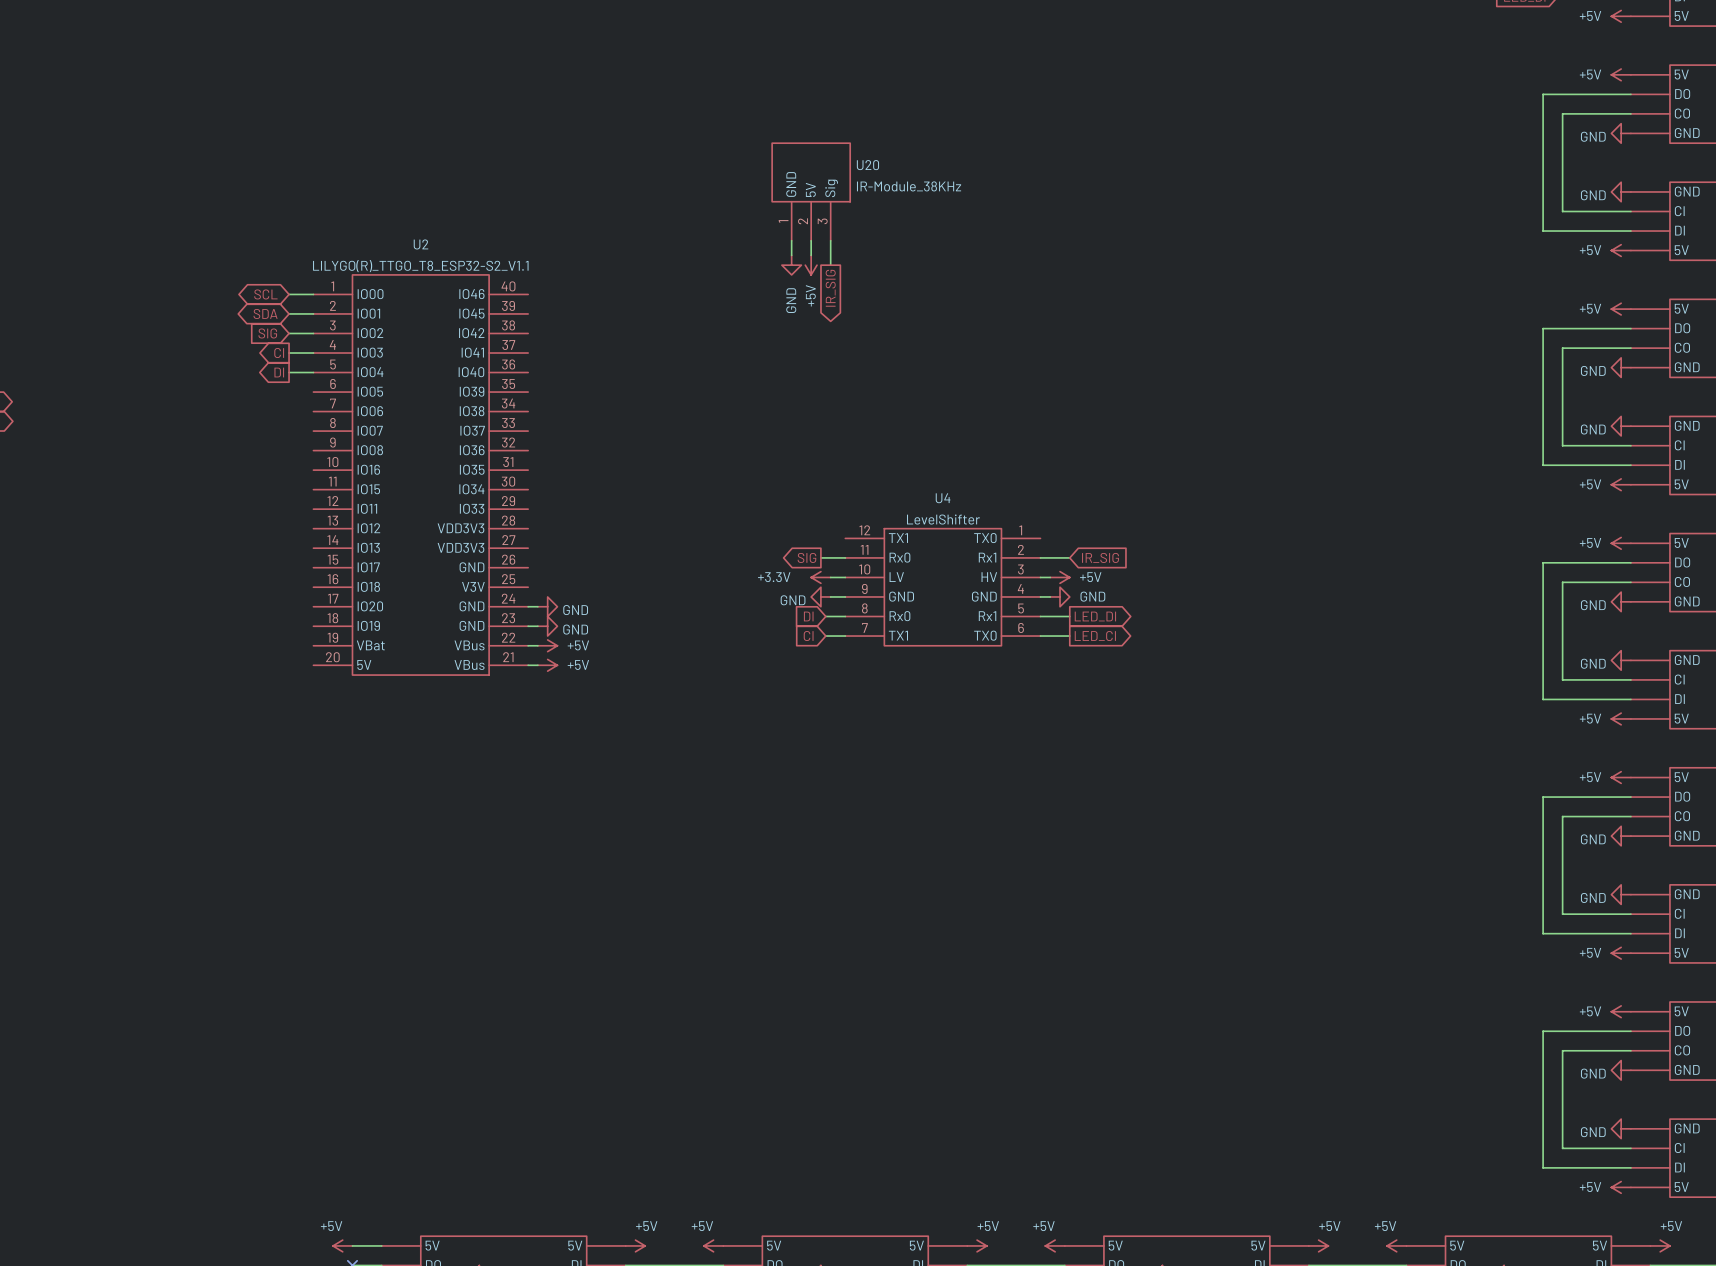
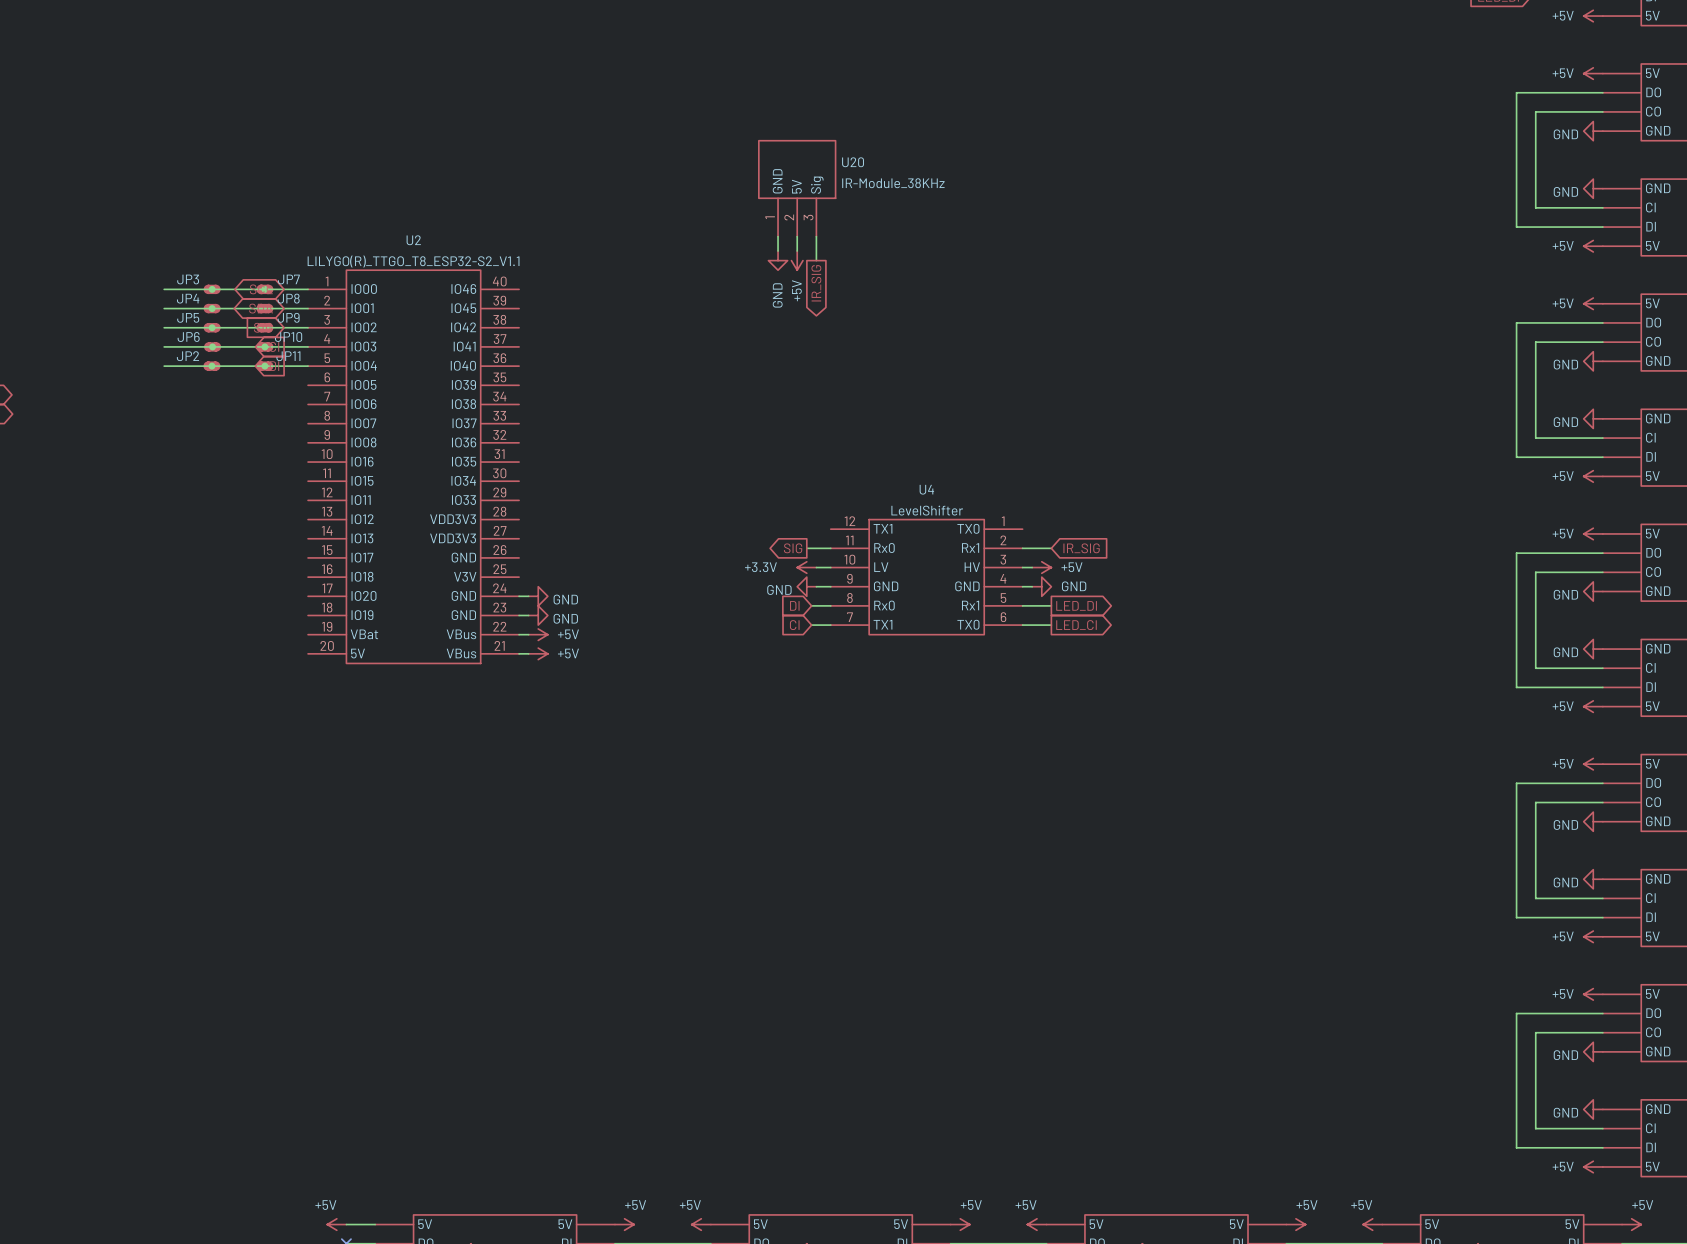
wire: none -> (164, 289) (284, 289)
junction: none -> (212, 289)
JP3: none -> (212, 289)
junction: none -> (264, 289)
JP7: none -> (264, 289)
wire: none -> (164, 308) (284, 308)
junction: none -> (212, 308)
JP4: none -> (212, 308)
JP8: none -> (264, 308)
wire: none -> (164, 327) (284, 327)
junction: none -> (212, 327)
JP5: none -> (212, 327)
JP9: none -> (264, 327)
wire: none -> (164, 346) (284, 346)
junction: none -> (212, 346)
JP6: none -> (212, 346)
junction: none -> (264, 346)
JP10: none -> (264, 346)
wire: none -> (164, 366) (284, 366)
junction: none -> (211, 366)
JP2: none -> (211, 366)
junction: none -> (264, 366)
JP11: none -> (264, 366)

